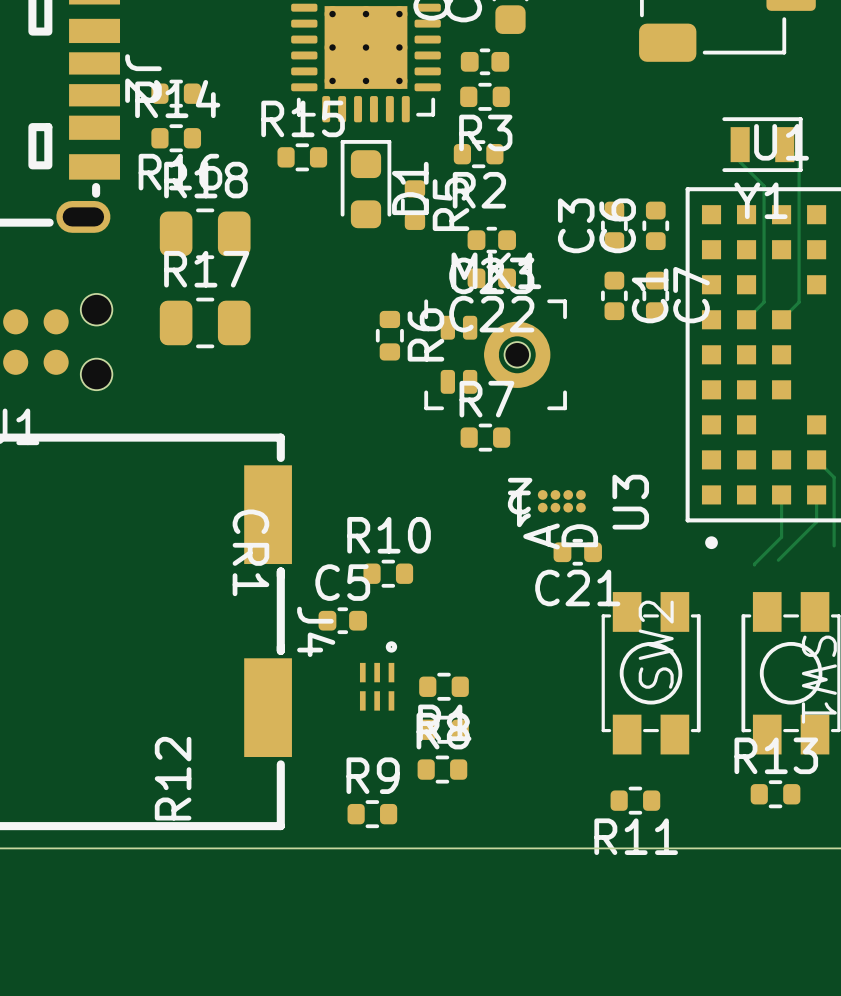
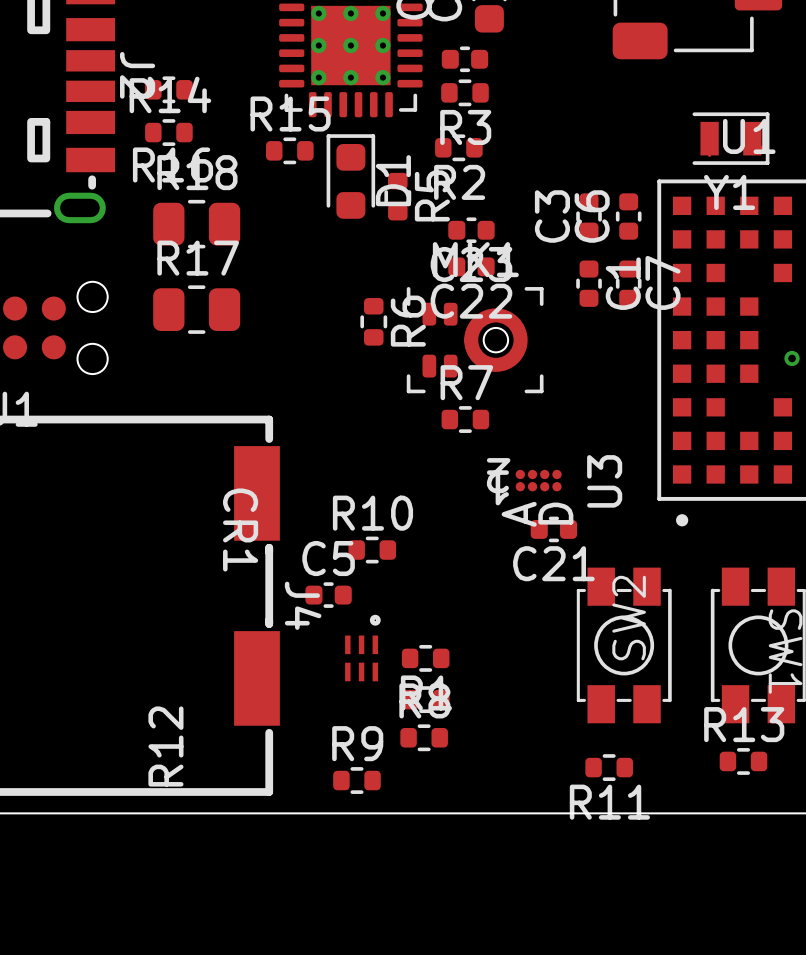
track: (799, 158) (799, 302) (781, 319) -> none
track: (740, 162) (764, 186) (764, 302) (746, 319) -> none
via: none -> (792, 358)
track: (816, 459) (834, 477) (834, 545) -> none
track: (781, 494) (781, 537) (754, 564) -> none
track: (816, 494) (816, 521) (778, 560) -> none

